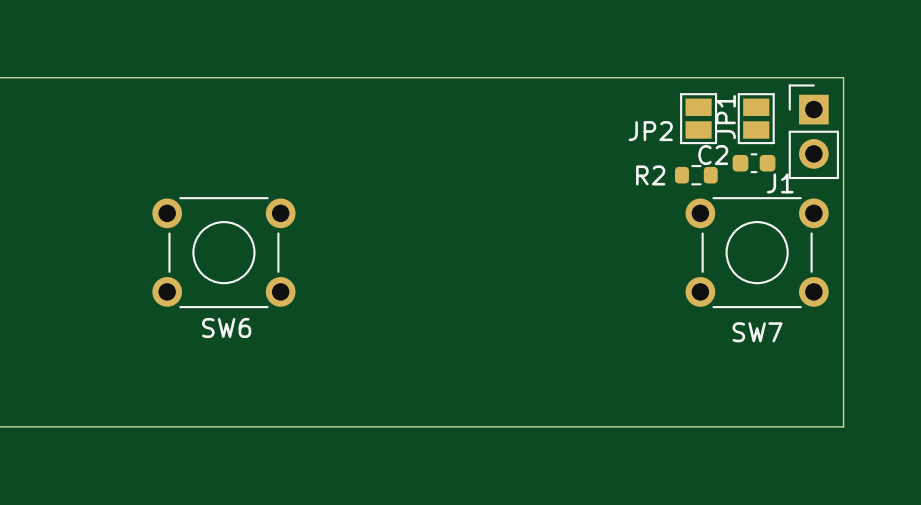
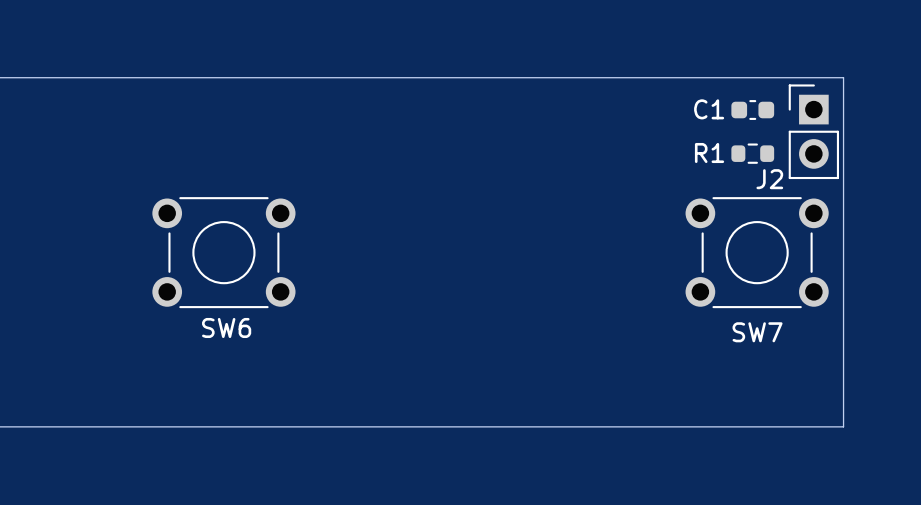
C1: none -> (752, 110)
JP1: (698, 118) -> none
JP2: (756, 118) -> none
R1: none -> (752, 153)
C2: (754, 163) -> none
R2: (696, 175) -> none
J1 name: J1 (780, 183) -> J2 (769, 179)

